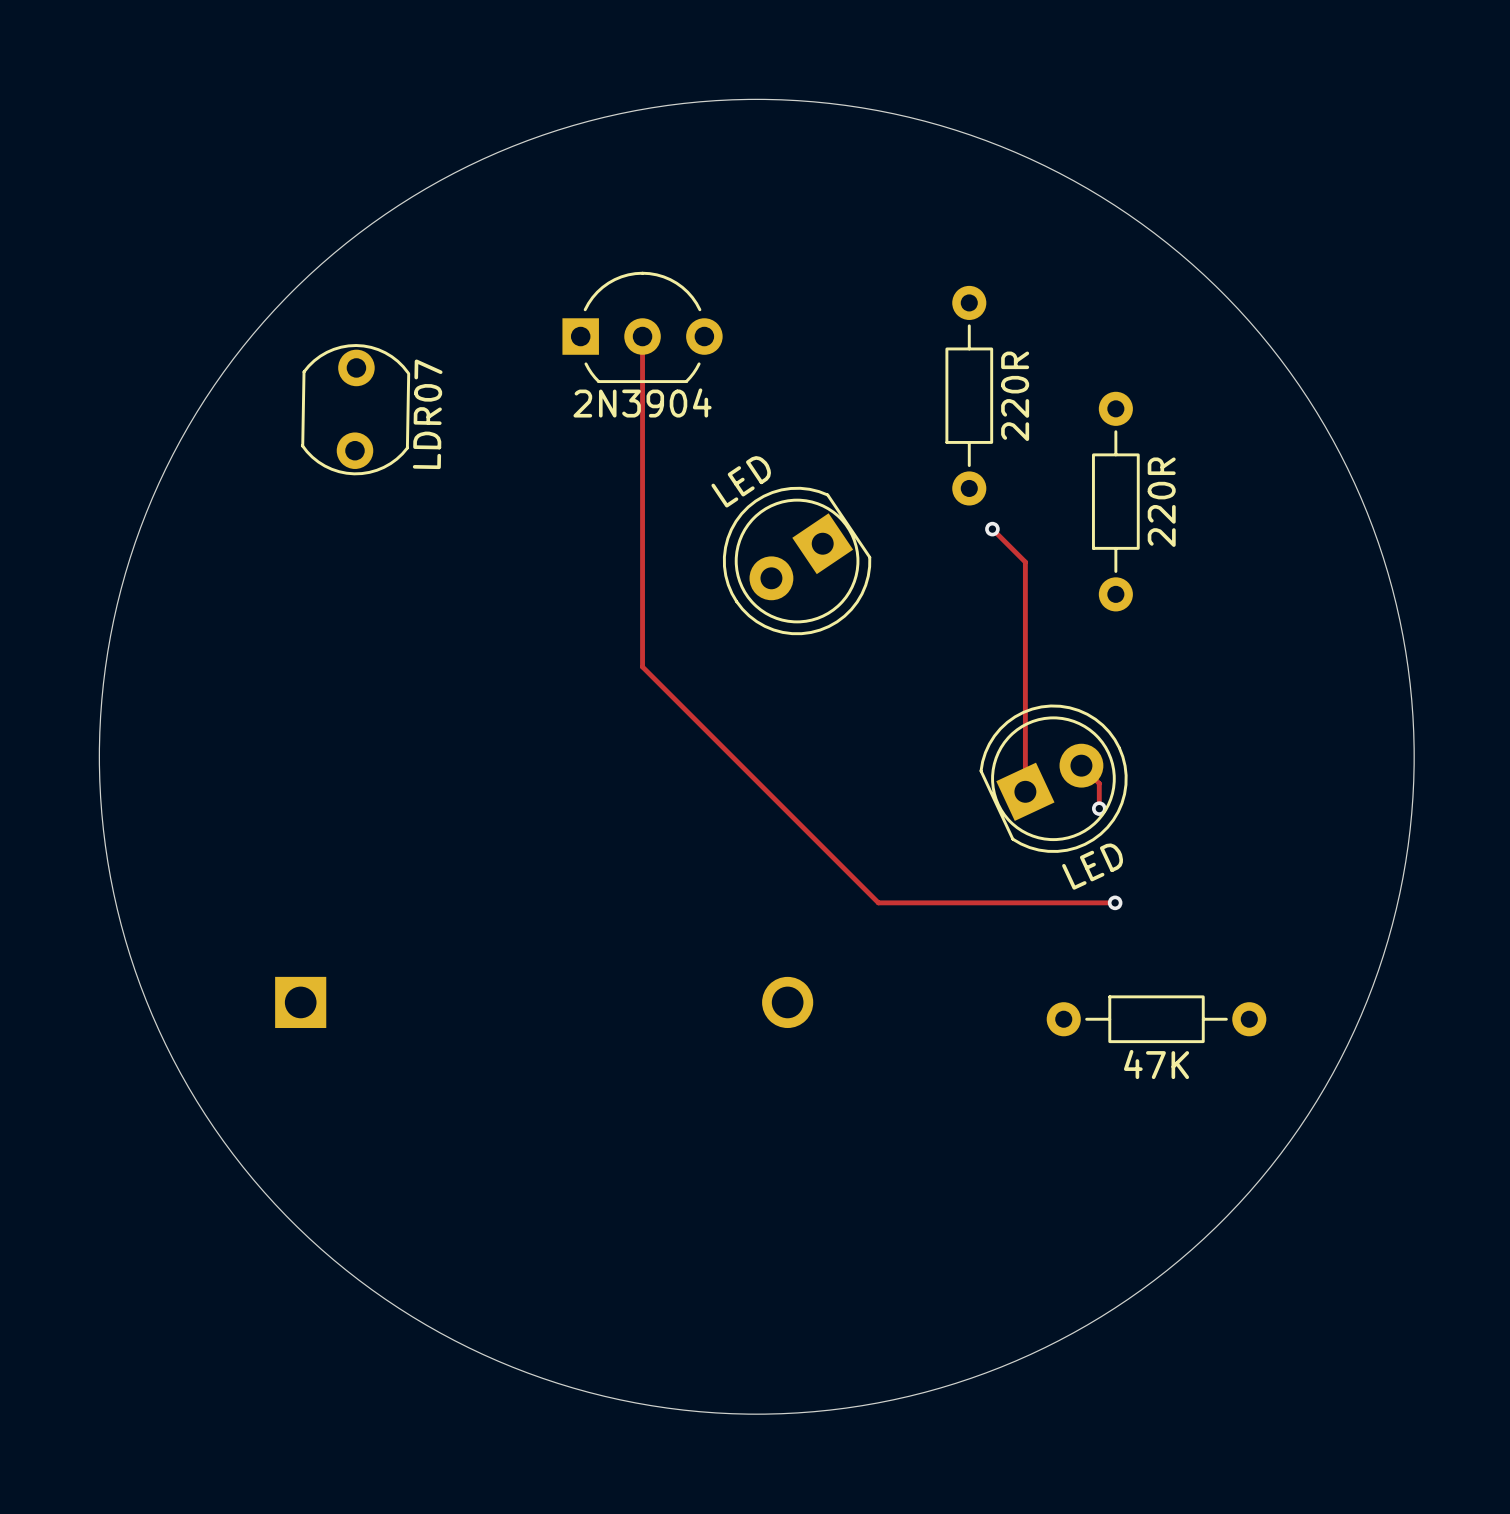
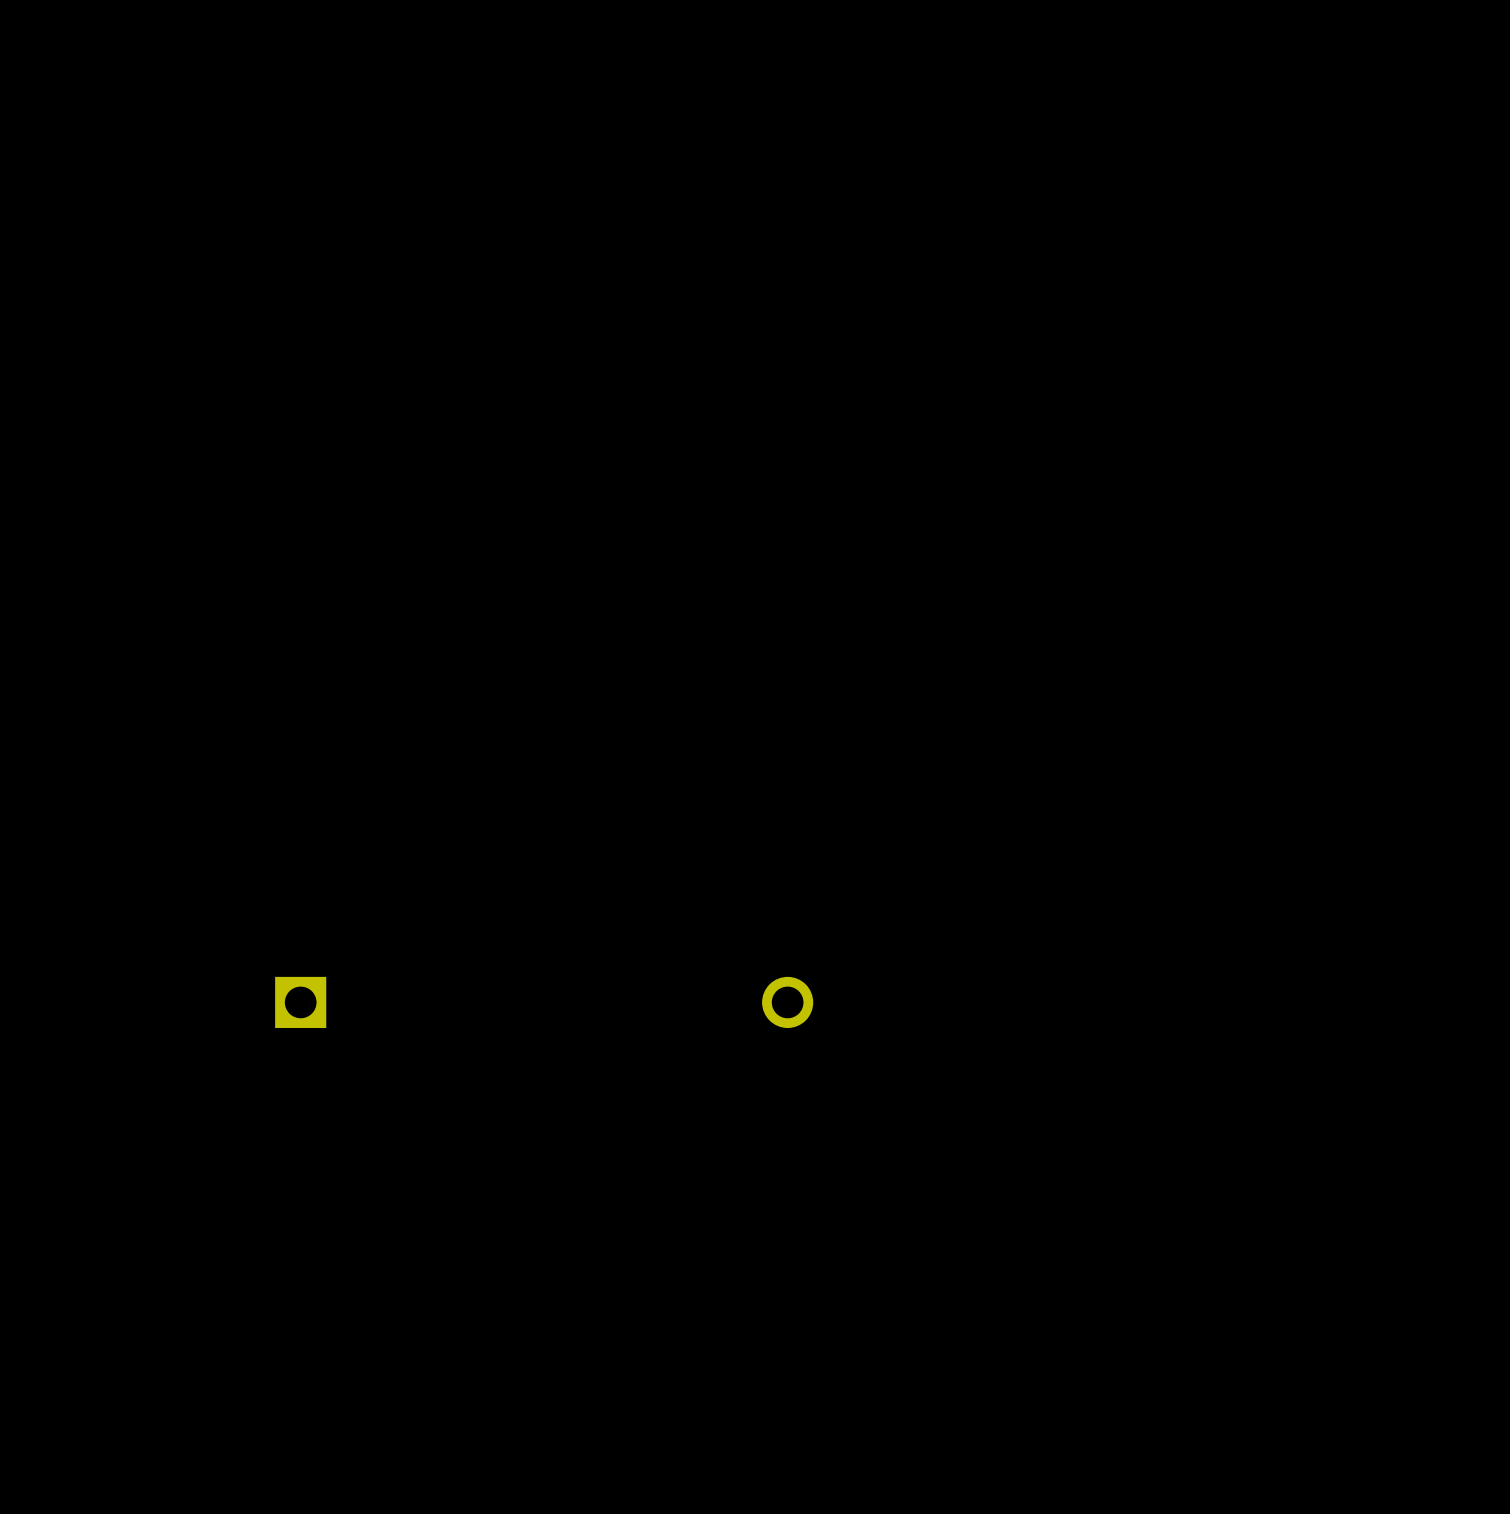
round board edge: [98, 98, 1415, 1415] -> none
part: 2N3904 (642, 327) -> none
track: (642, 336) (642, 666) (878, 902) (1115, 902) -> none
part: 220R (969, 395) -> none
part: LDR07 (355, 409) -> none
part: 220R (1115, 501) -> none
track: (992, 529) (1025, 562) (1025, 791) -> none
via: (992, 529) -> none
part: LED (797, 560) -> none
track: (1081, 765) (1099, 783) (1099, 808) -> none
part: LED (1053, 778) -> none
via: (1099, 808) -> none
via: (1115, 902) -> none
part: 47K (1156, 1019) -> none

